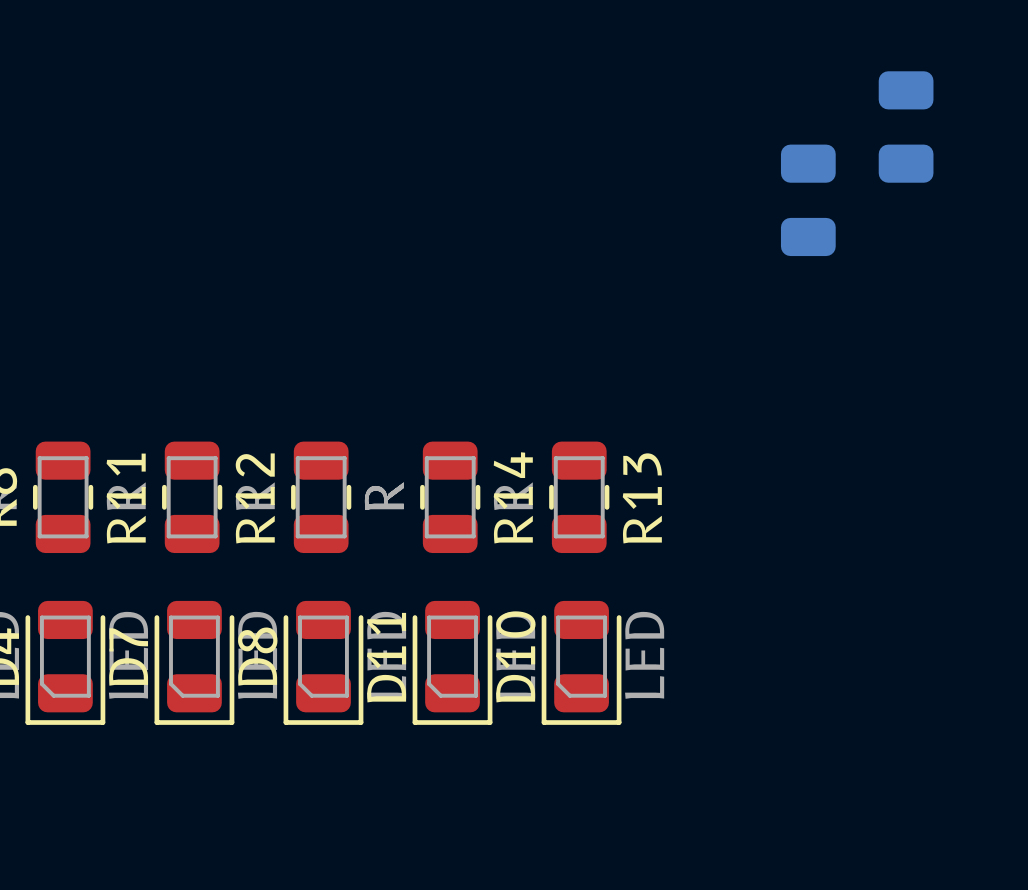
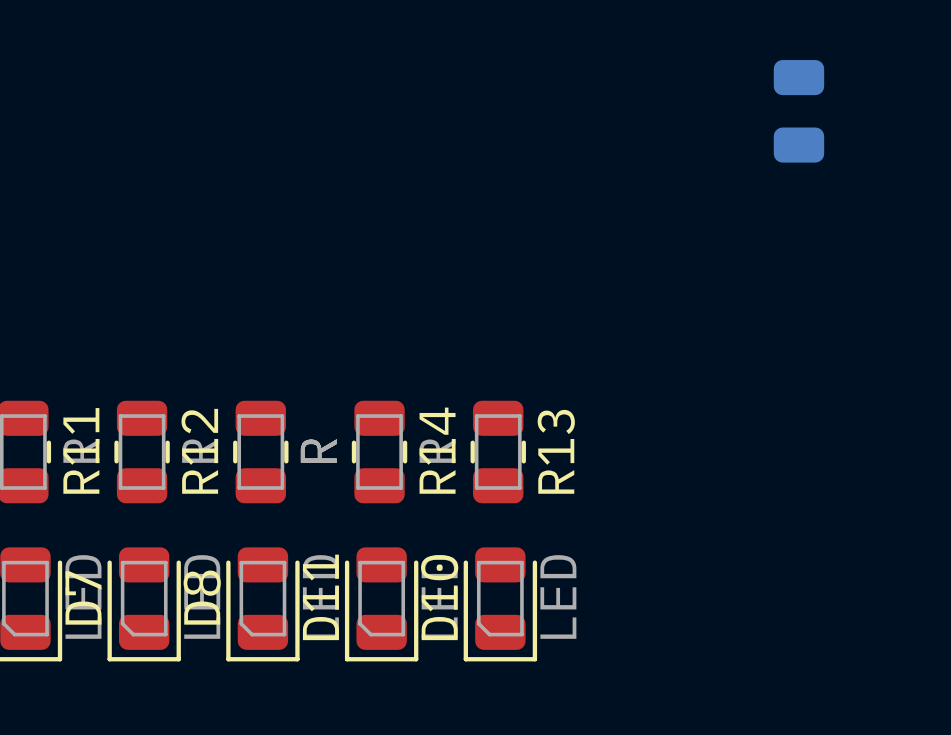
part: (808, 200) -> none

